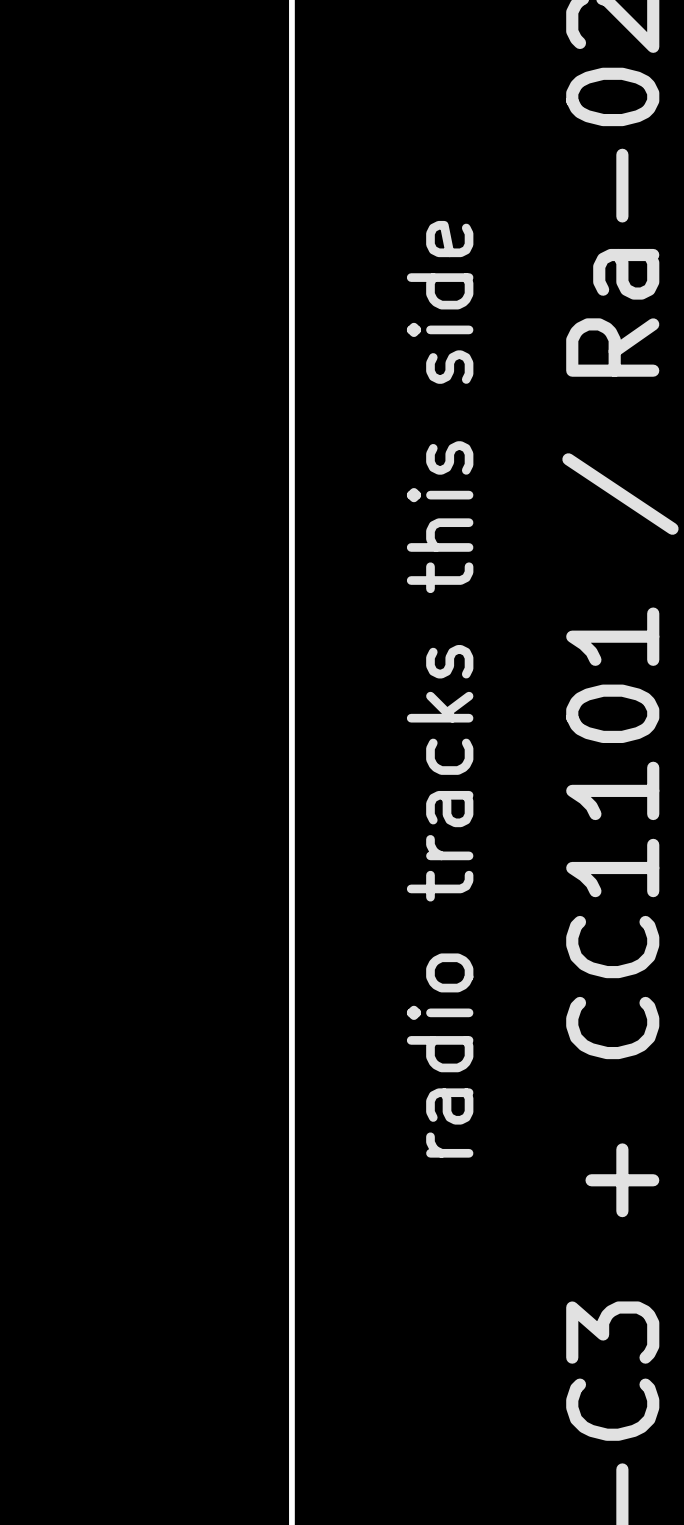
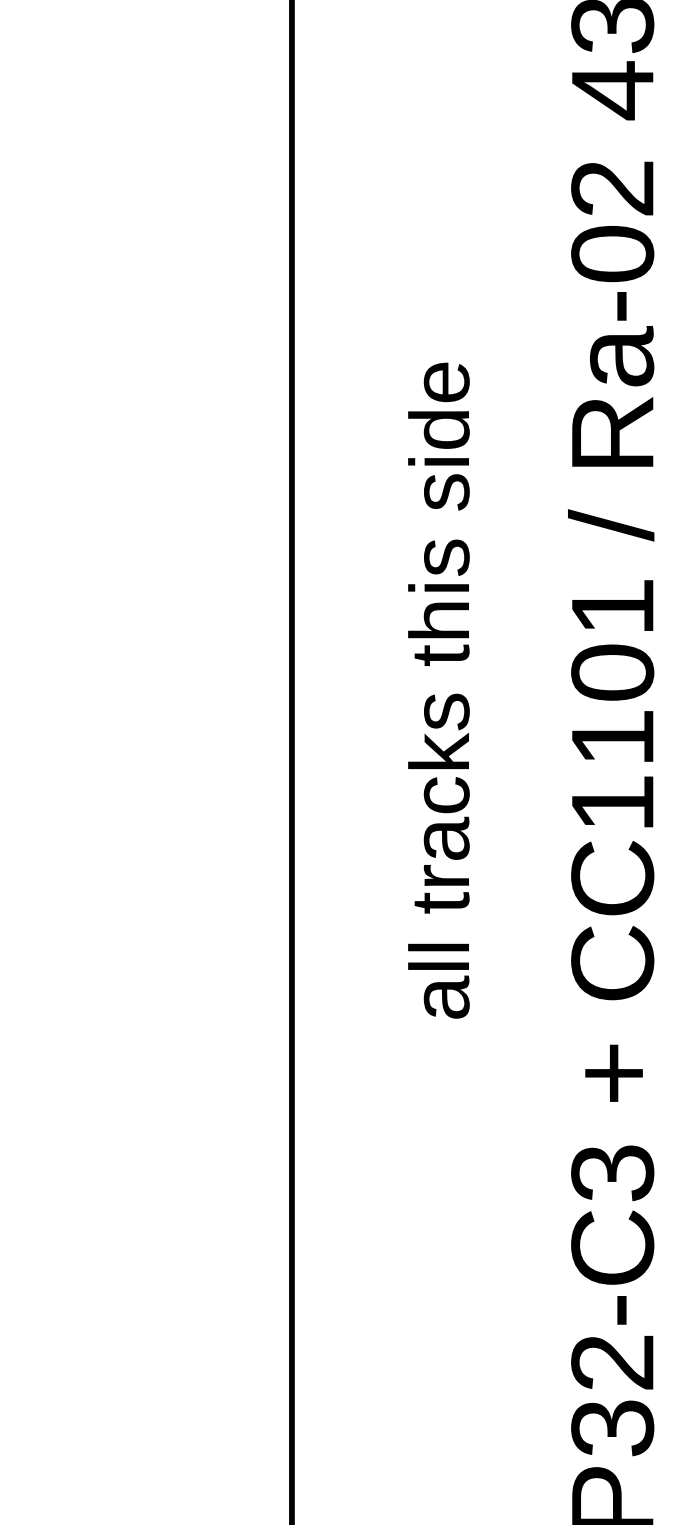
text: radio tracks this side (440, 689) -> all tracks this side (439, 690)

